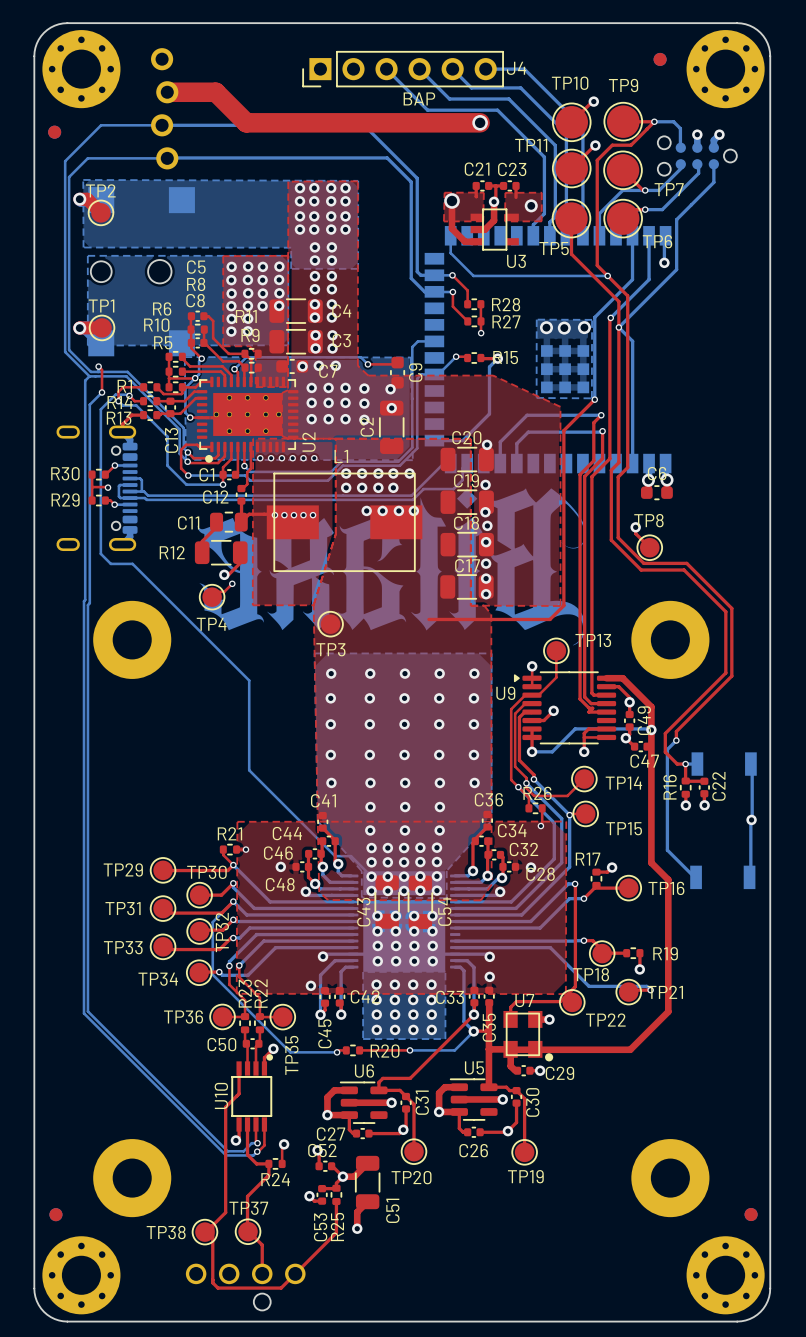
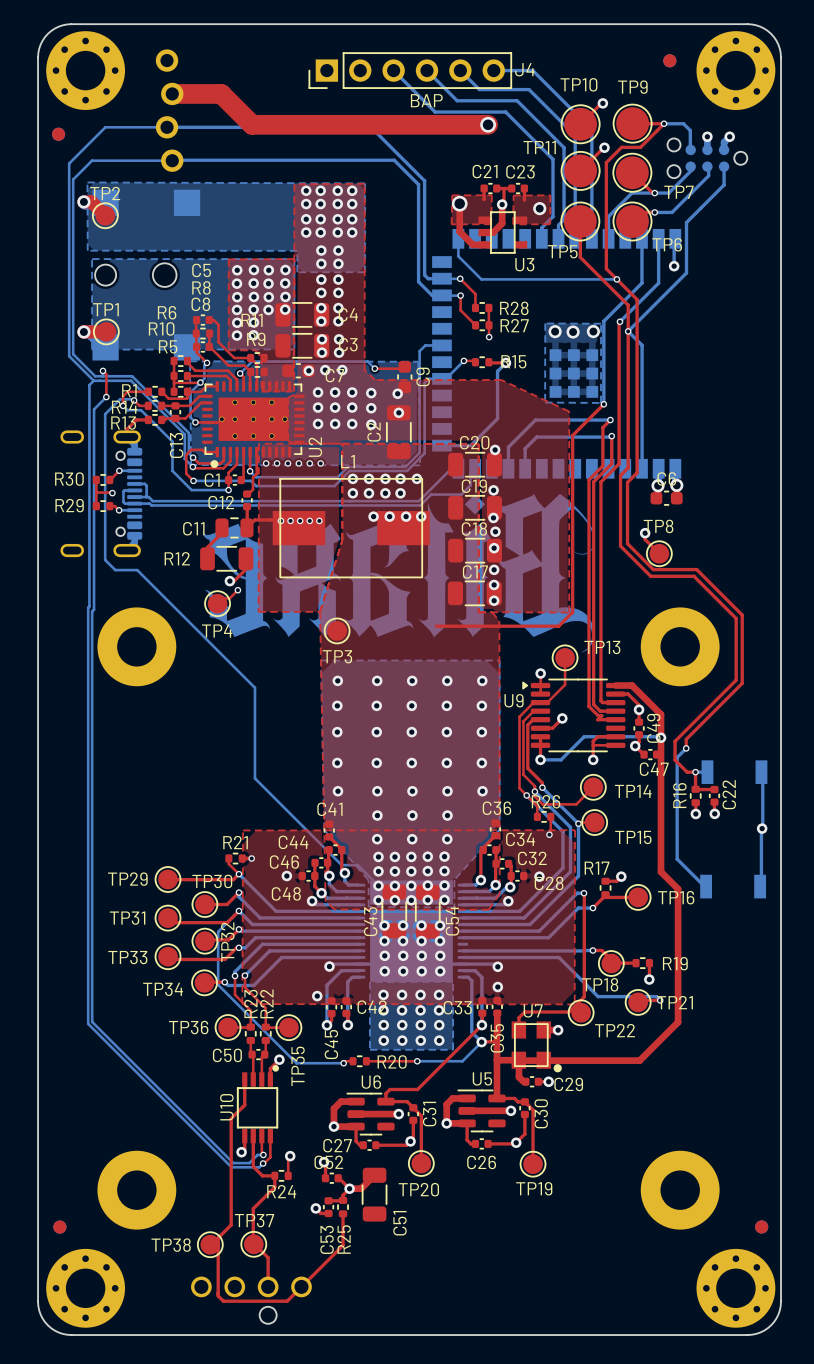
top track: (367, 1201) (357, 1212) (357, 1228) -> none
via: (357, 1228) -> none

